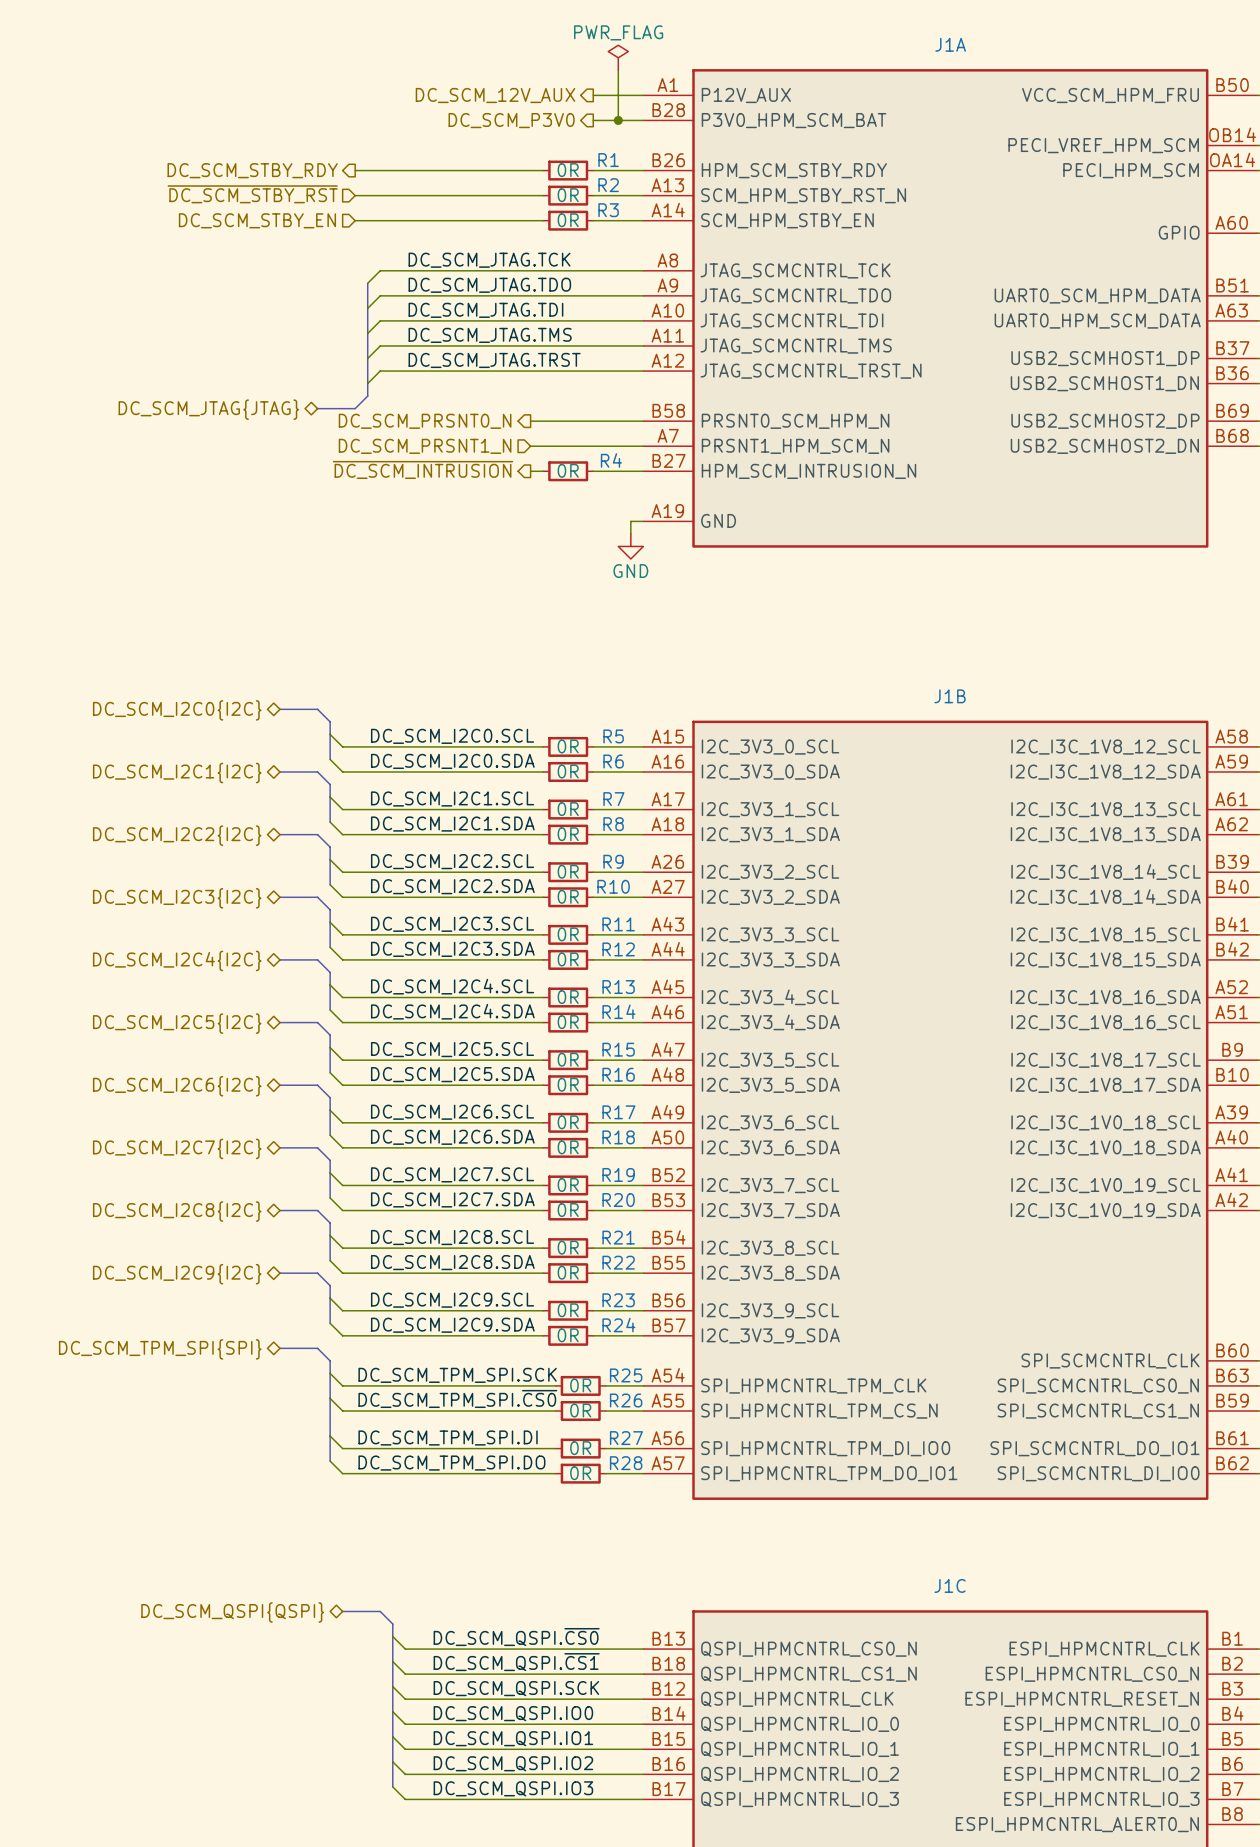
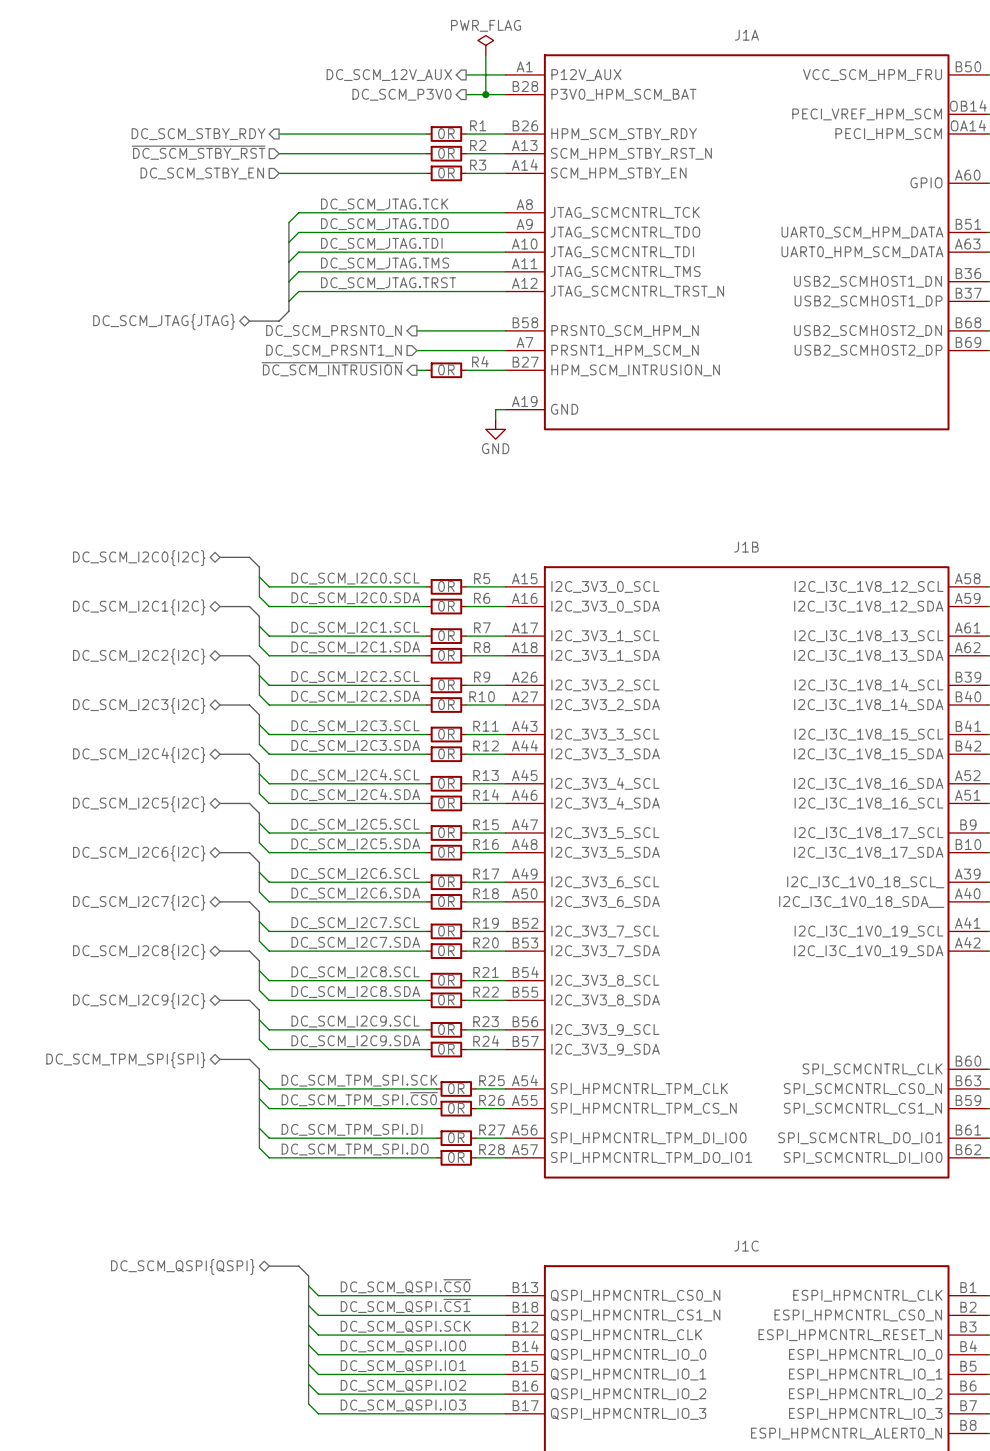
J1A pin number: B37 (1232, 348) -> B36 (968, 273)
J1A pin name: USB2_SCMHOST1_DP (1105, 358) -> USB2_SCMHOST1_DN (868, 281)
J1A pin number: B36 (1232, 373) -> B37 (968, 293)
J1A pin name: USB2_SCMHOST1_DN (1104, 383) -> USB2_SCMHOST1_DP (868, 301)
J1A pin number: B69 (1232, 410) -> B68 (968, 322)
J1A pin name: USB2_SCMHOST2_DP (1105, 421) -> USB2_SCMHOST2_DN (868, 331)
J1A pin number: B68 (1232, 435) -> B69 (968, 342)
J1A pin name: USB2_SCMHOST2_DN (1104, 446) -> USB2_SCMHOST2_DP (868, 350)
J1B pin name: I2C_I3C_1V0_18_SCL (1106, 1122) -> I2C_I3C_1V0_18_SCL_ (865, 882)
J1B pin name: I2C_I3C_1V0_18_SDA (1105, 1148) -> I2C_I3C_1V0_18_SDA__ (861, 902)

